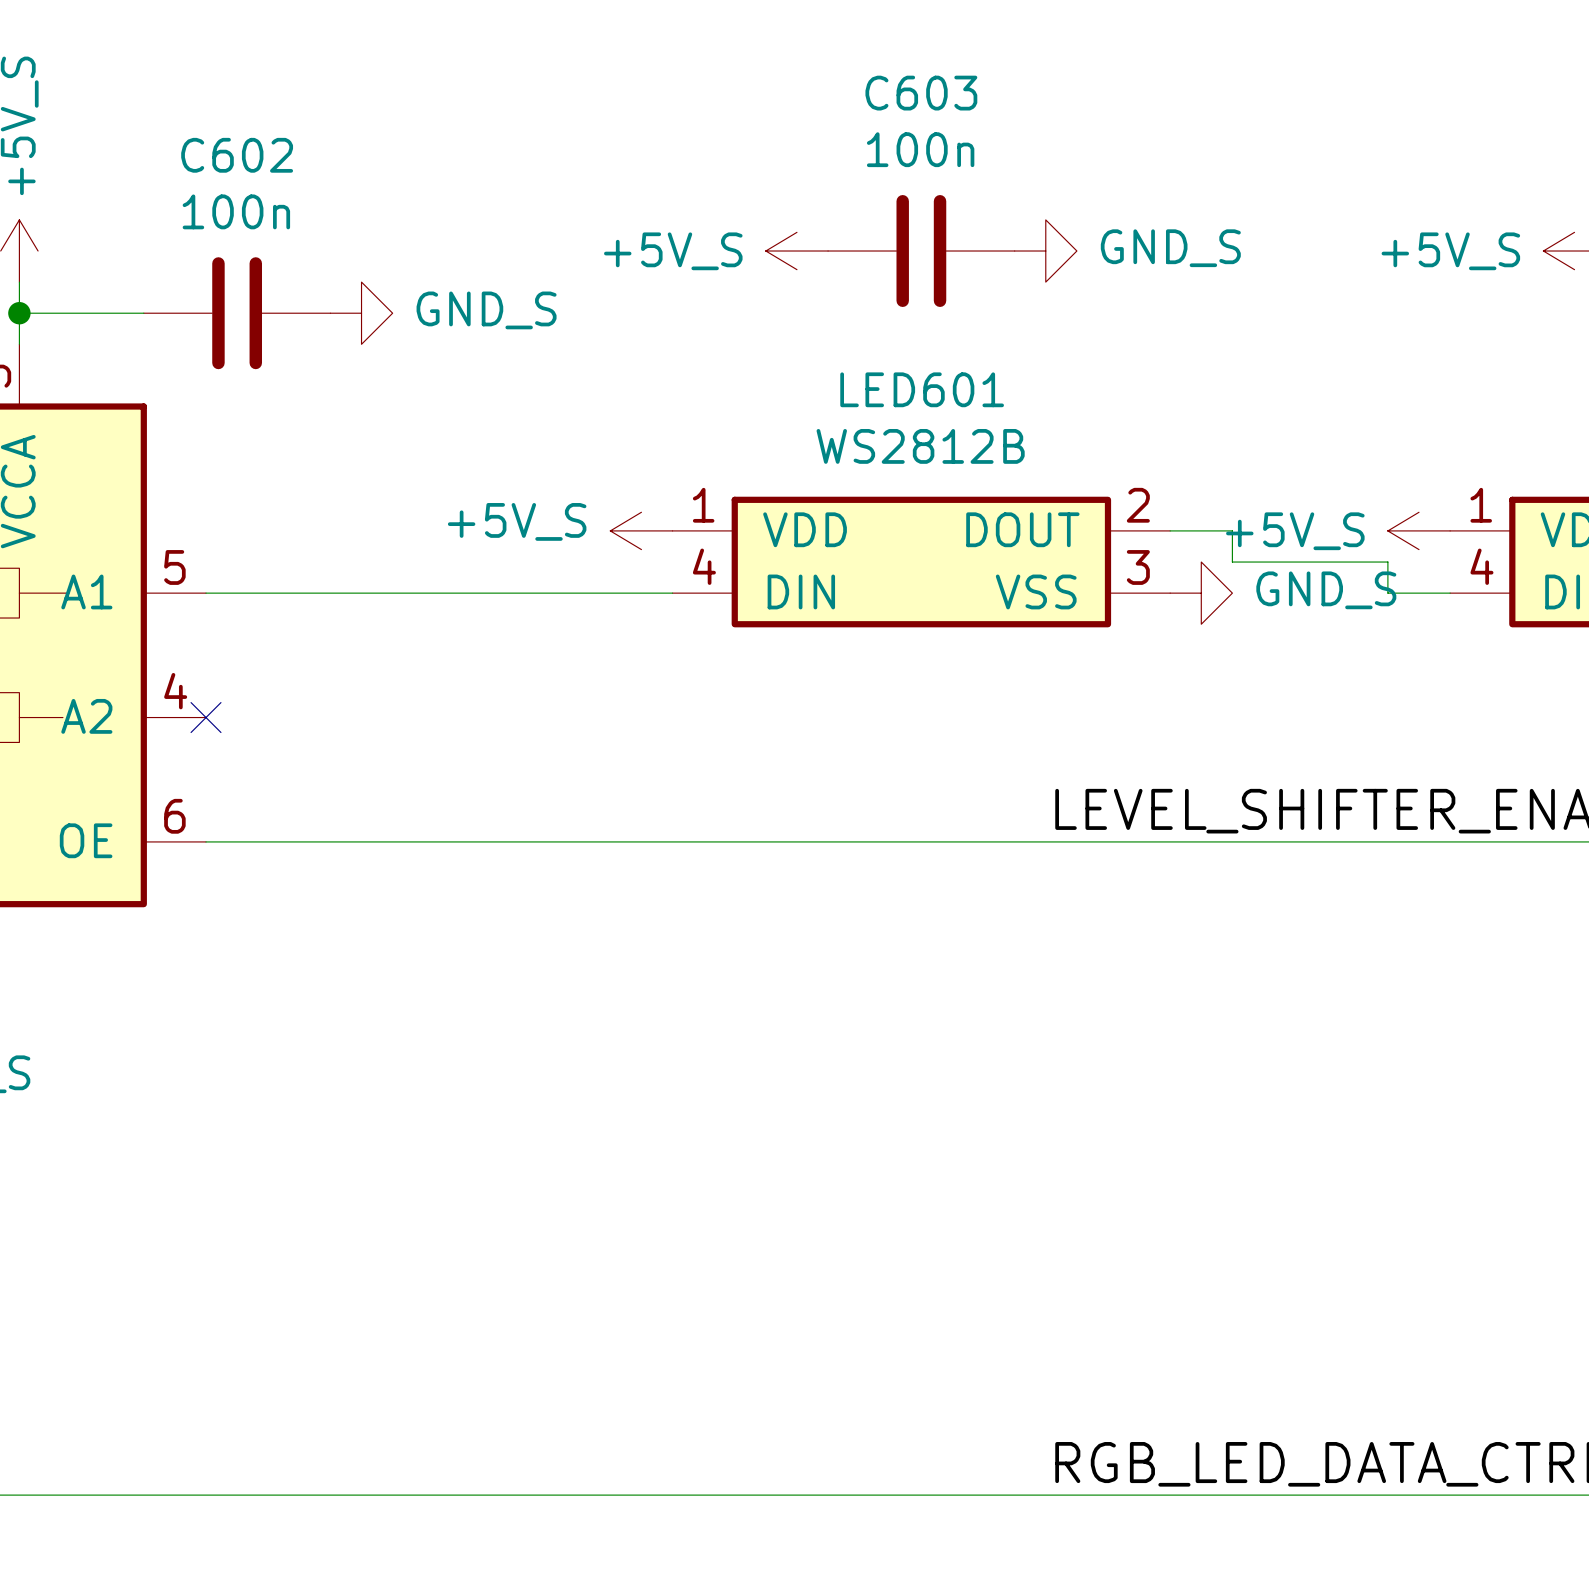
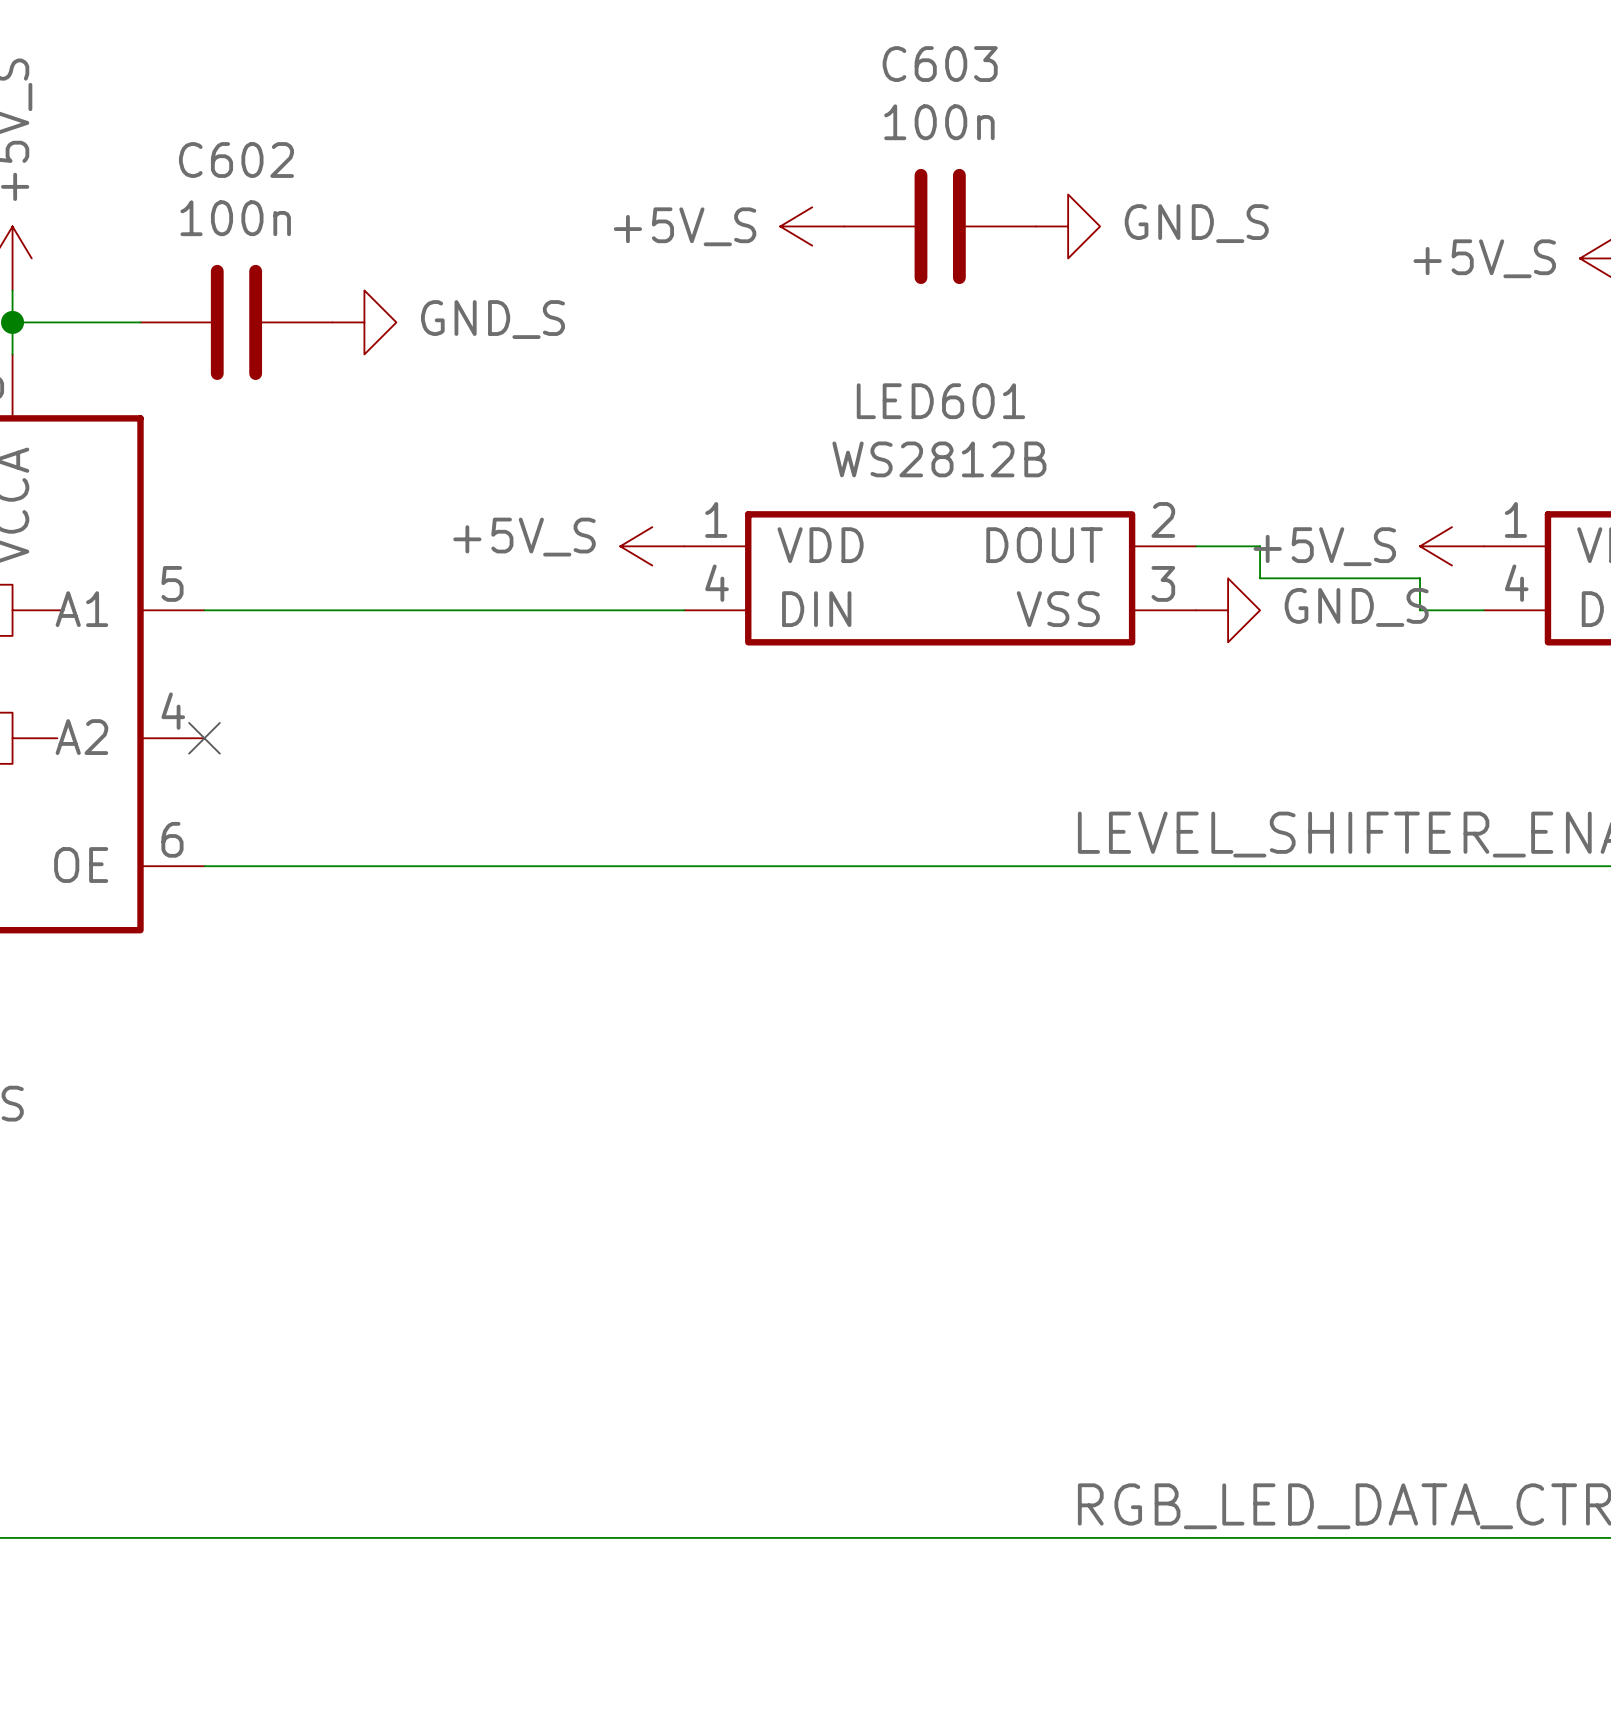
power symbol position: +5V_S (796, 251) -> +5V_S (812, 226)
C603 position: (921, 251) -> (940, 226)
power symbol position: GND_S (1045, 251) -> GND_S (1068, 226)

